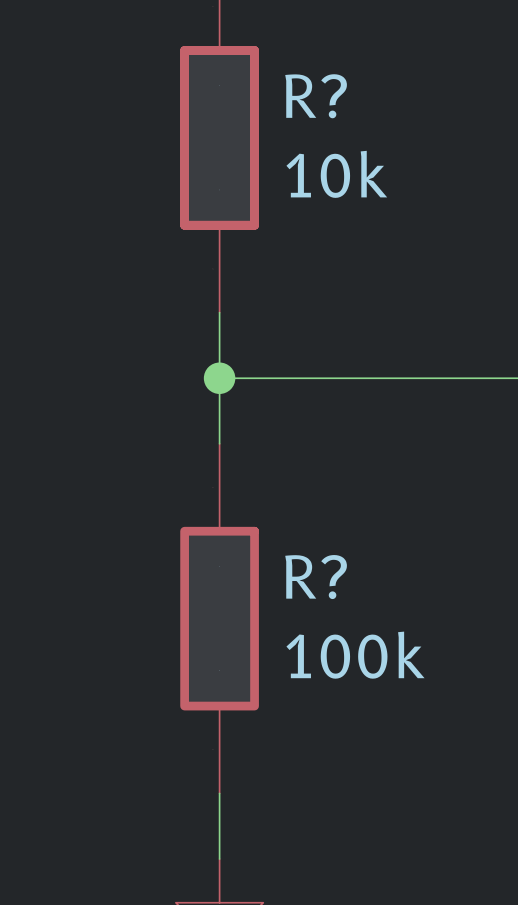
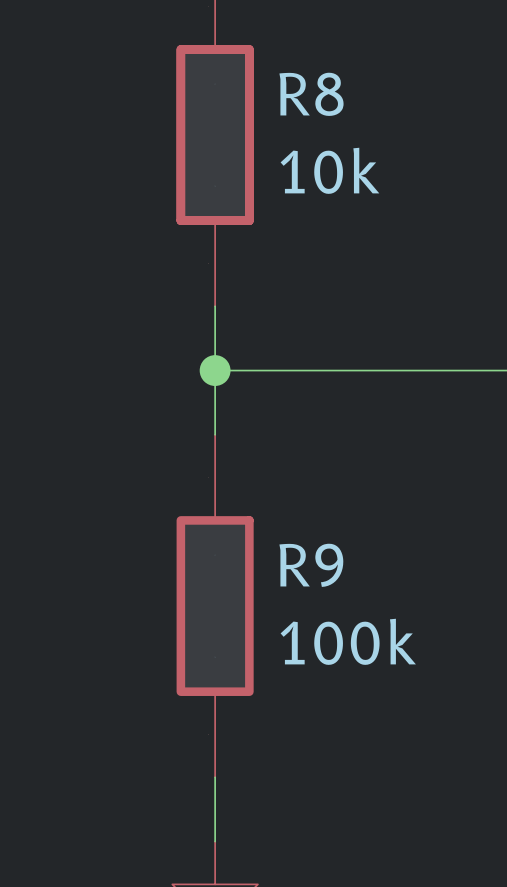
R? name: R? (316, 96) -> R8 (311, 94)
R? name: R? (316, 577) -> R9 (311, 565)

